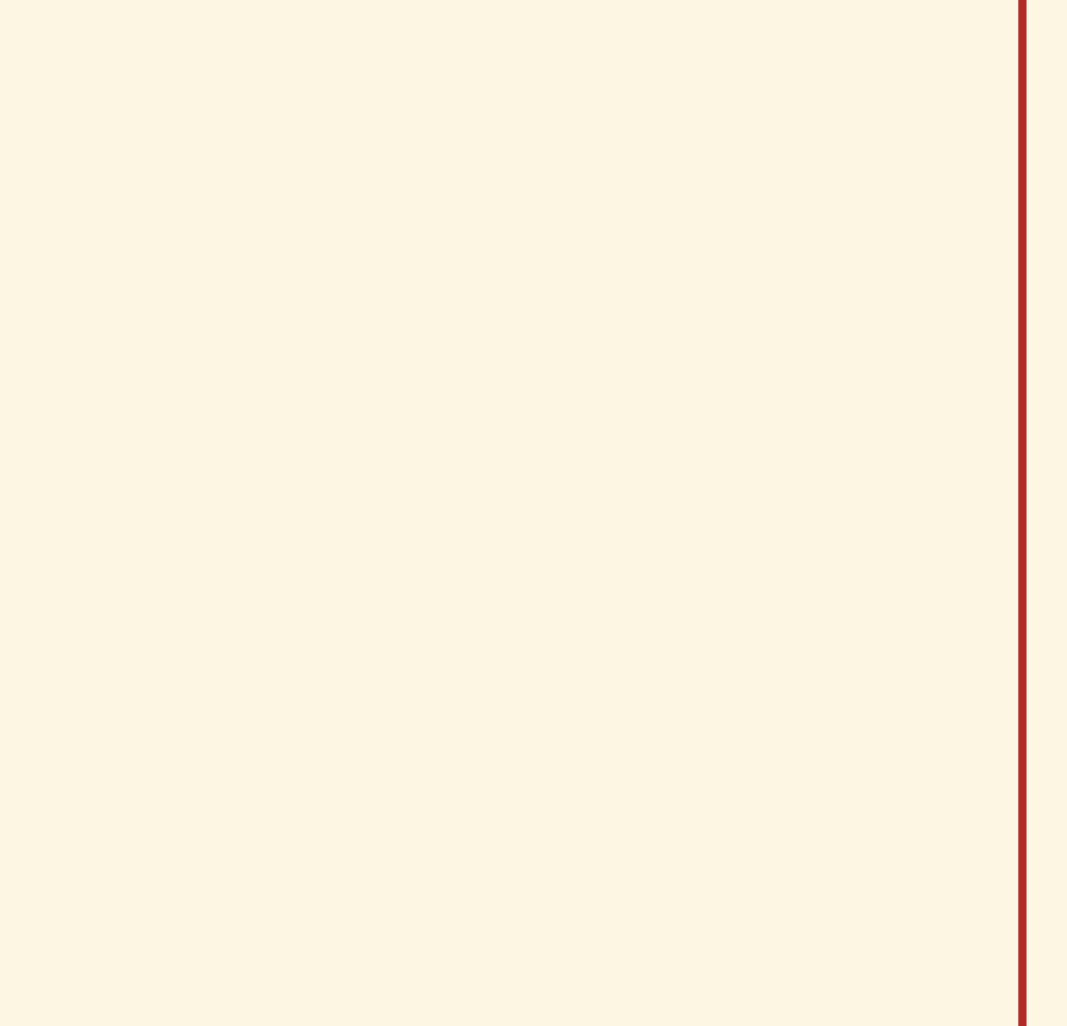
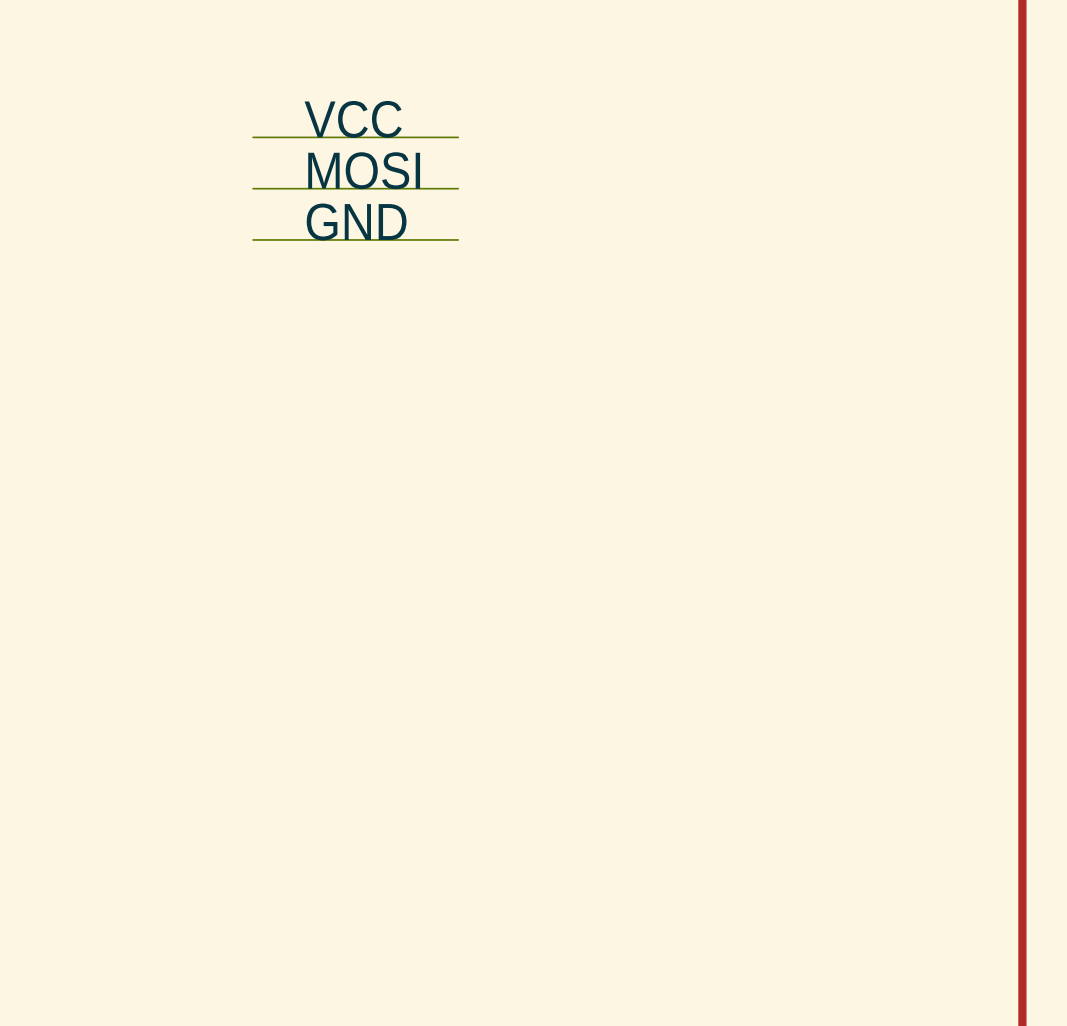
label: none -> VCC (353, 119)
wire: none -> (253, 137) (458, 137)
label: none -> MOSI (364, 170)
wire: none -> (253, 188) (458, 188)
label: none -> GND (356, 222)
wire: none -> (253, 239) (458, 239)

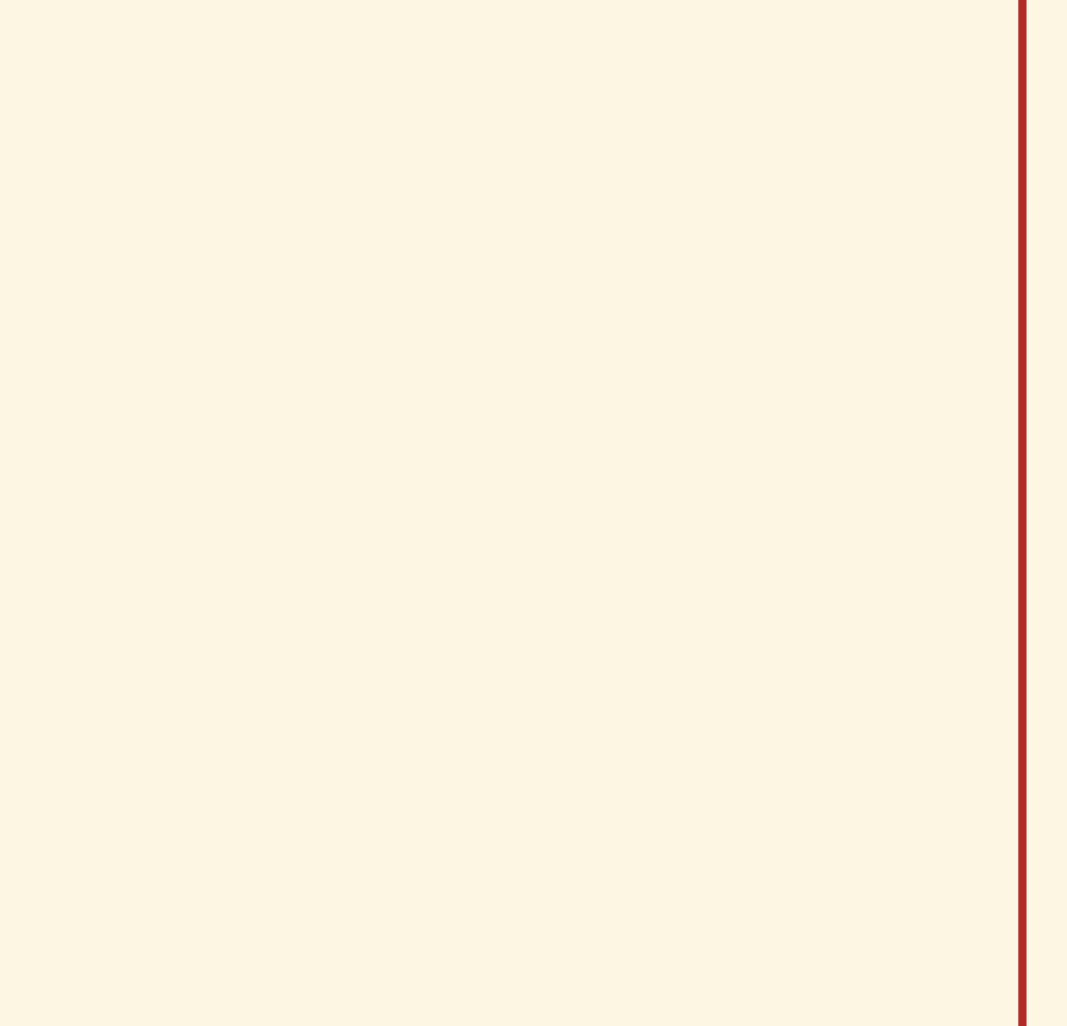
label: VCC (353, 119) -> none
wire: (253, 137) (458, 137) -> none
label: MOSI (364, 170) -> none
wire: (253, 188) (458, 188) -> none
label: GND (356, 222) -> none
wire: (253, 239) (458, 239) -> none

